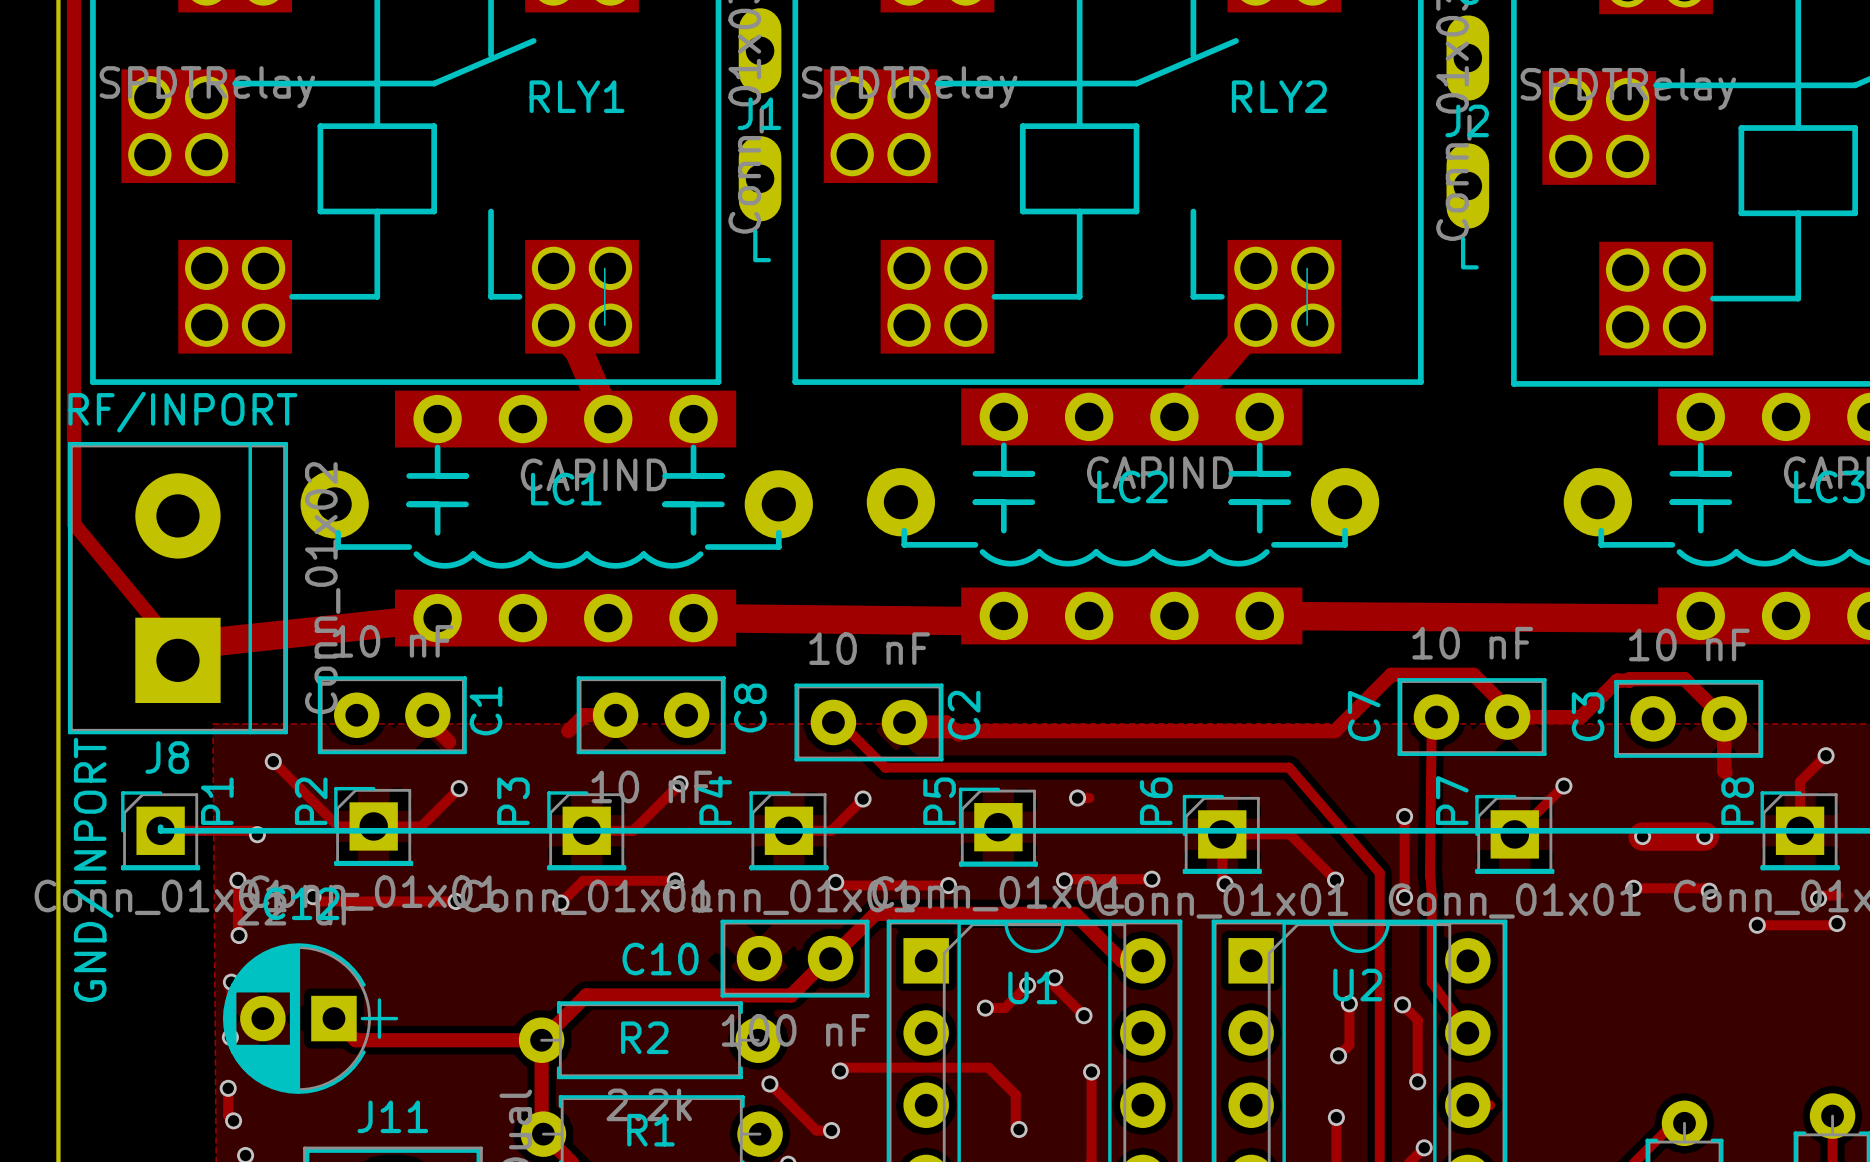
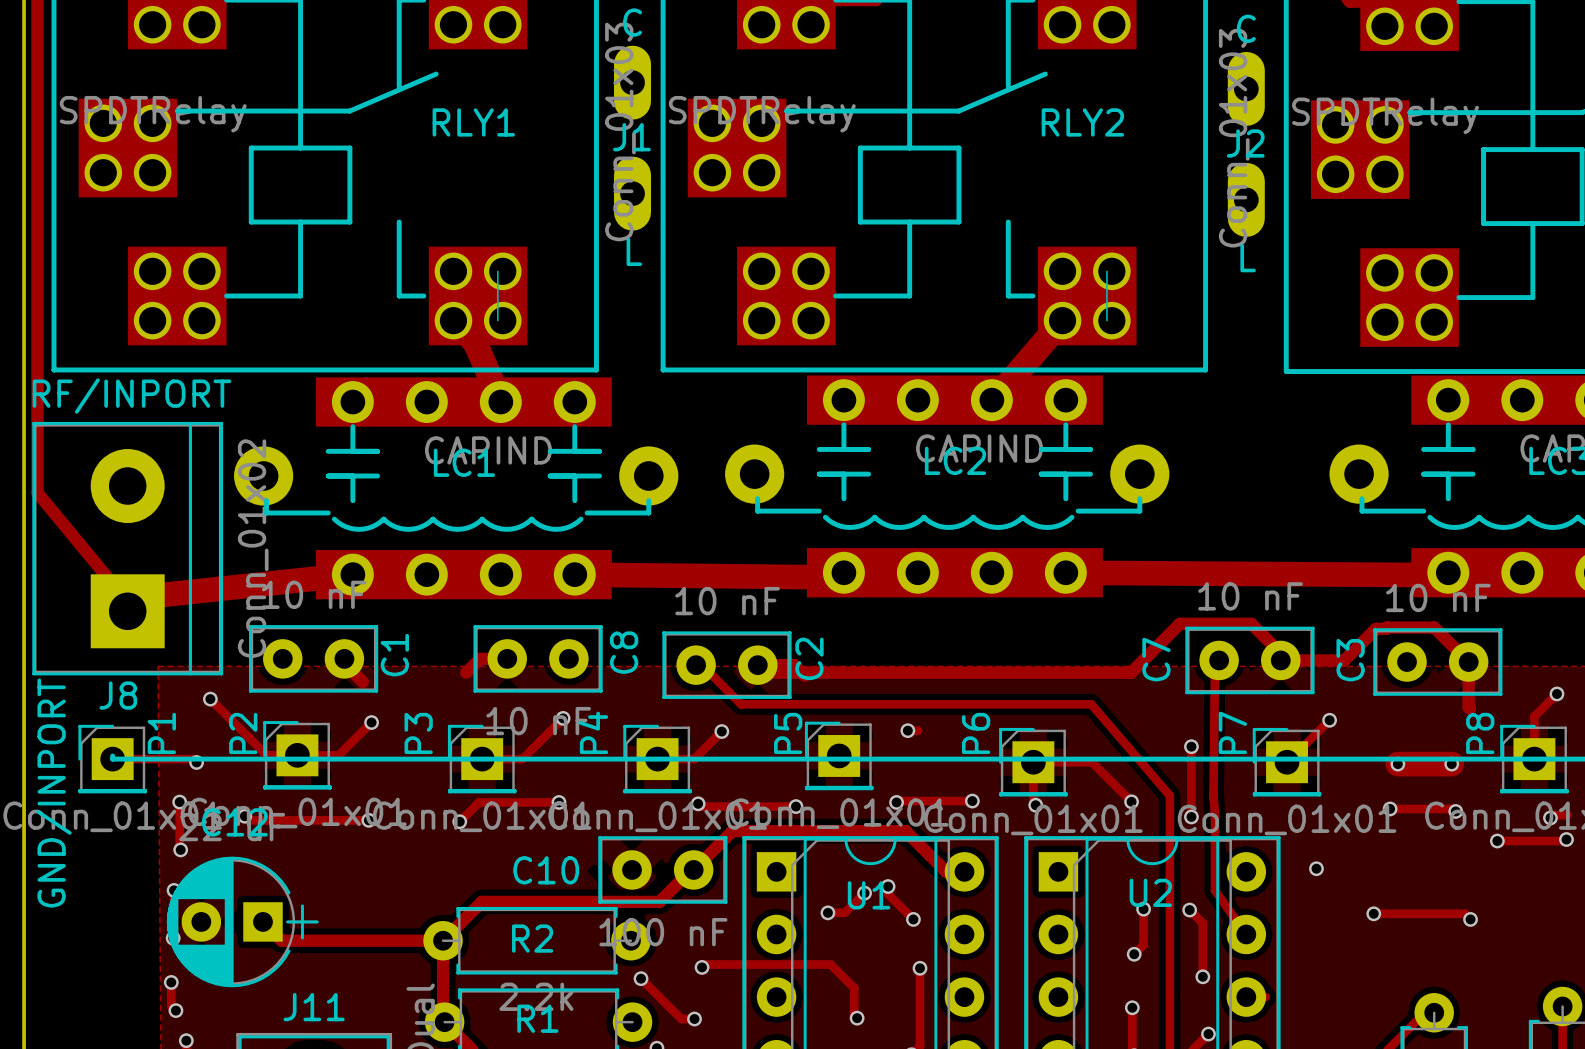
via: none -> (1316, 868)
track: none -> (1373, 913) (1464, 913) (1470, 919)
via: none -> (1373, 913)
via: none -> (1470, 919)

